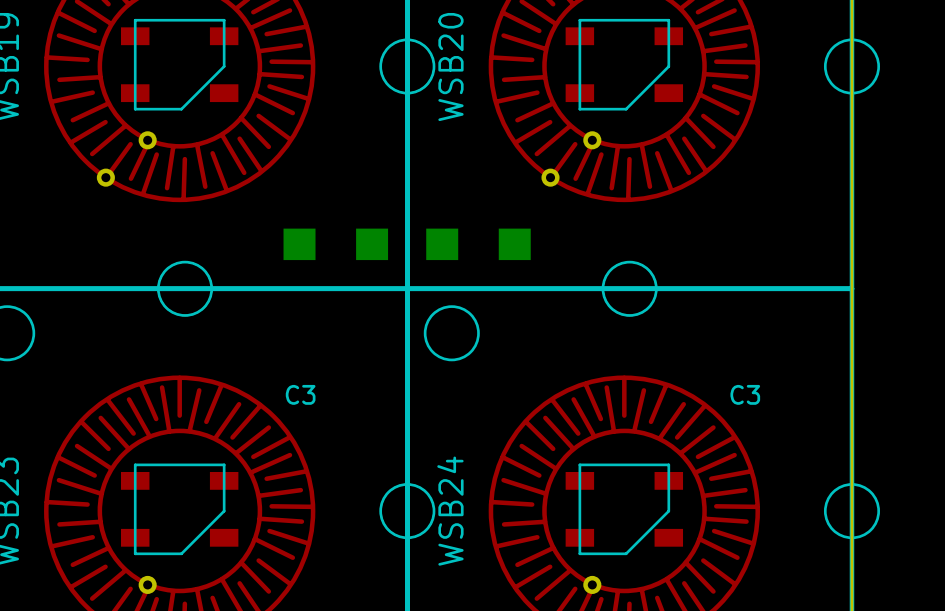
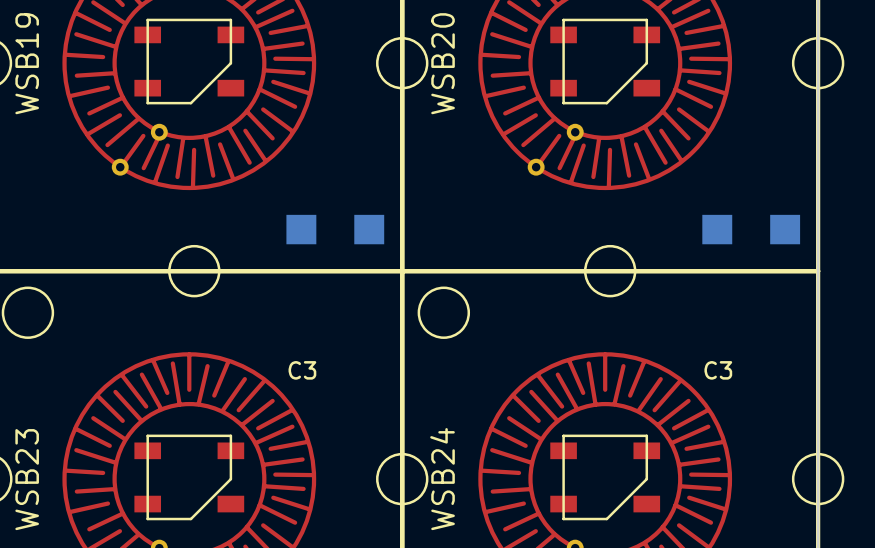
part position: (478, 244) -> (751, 229)

